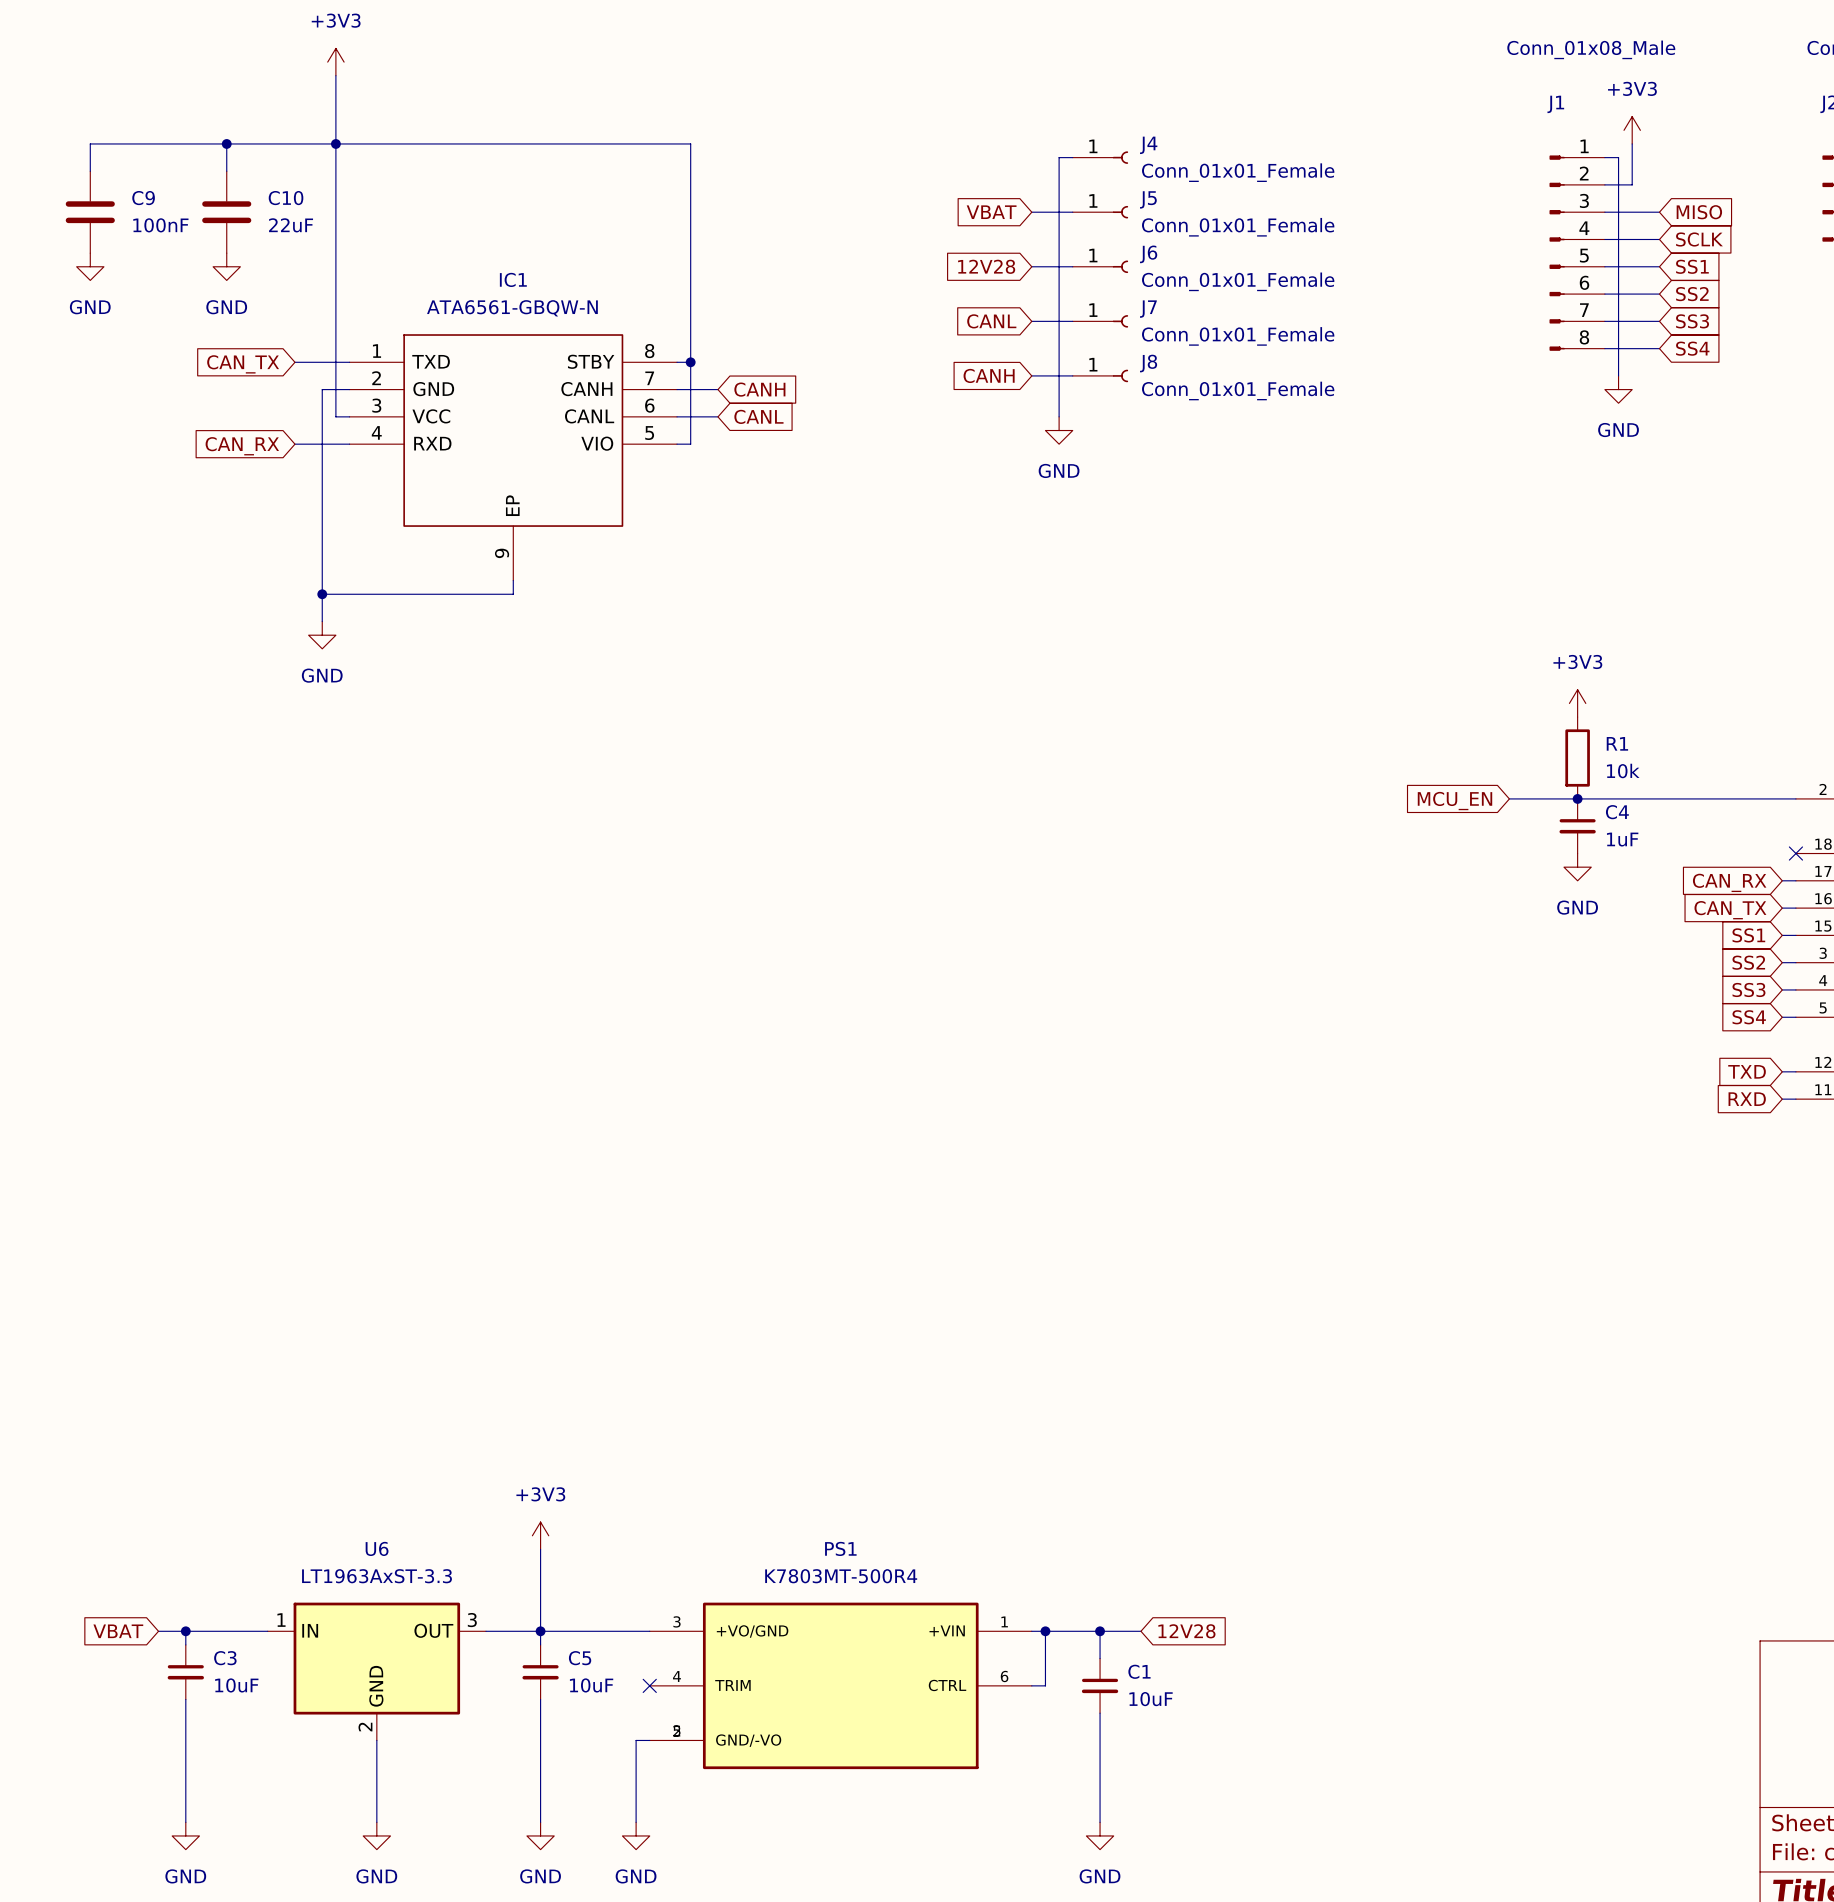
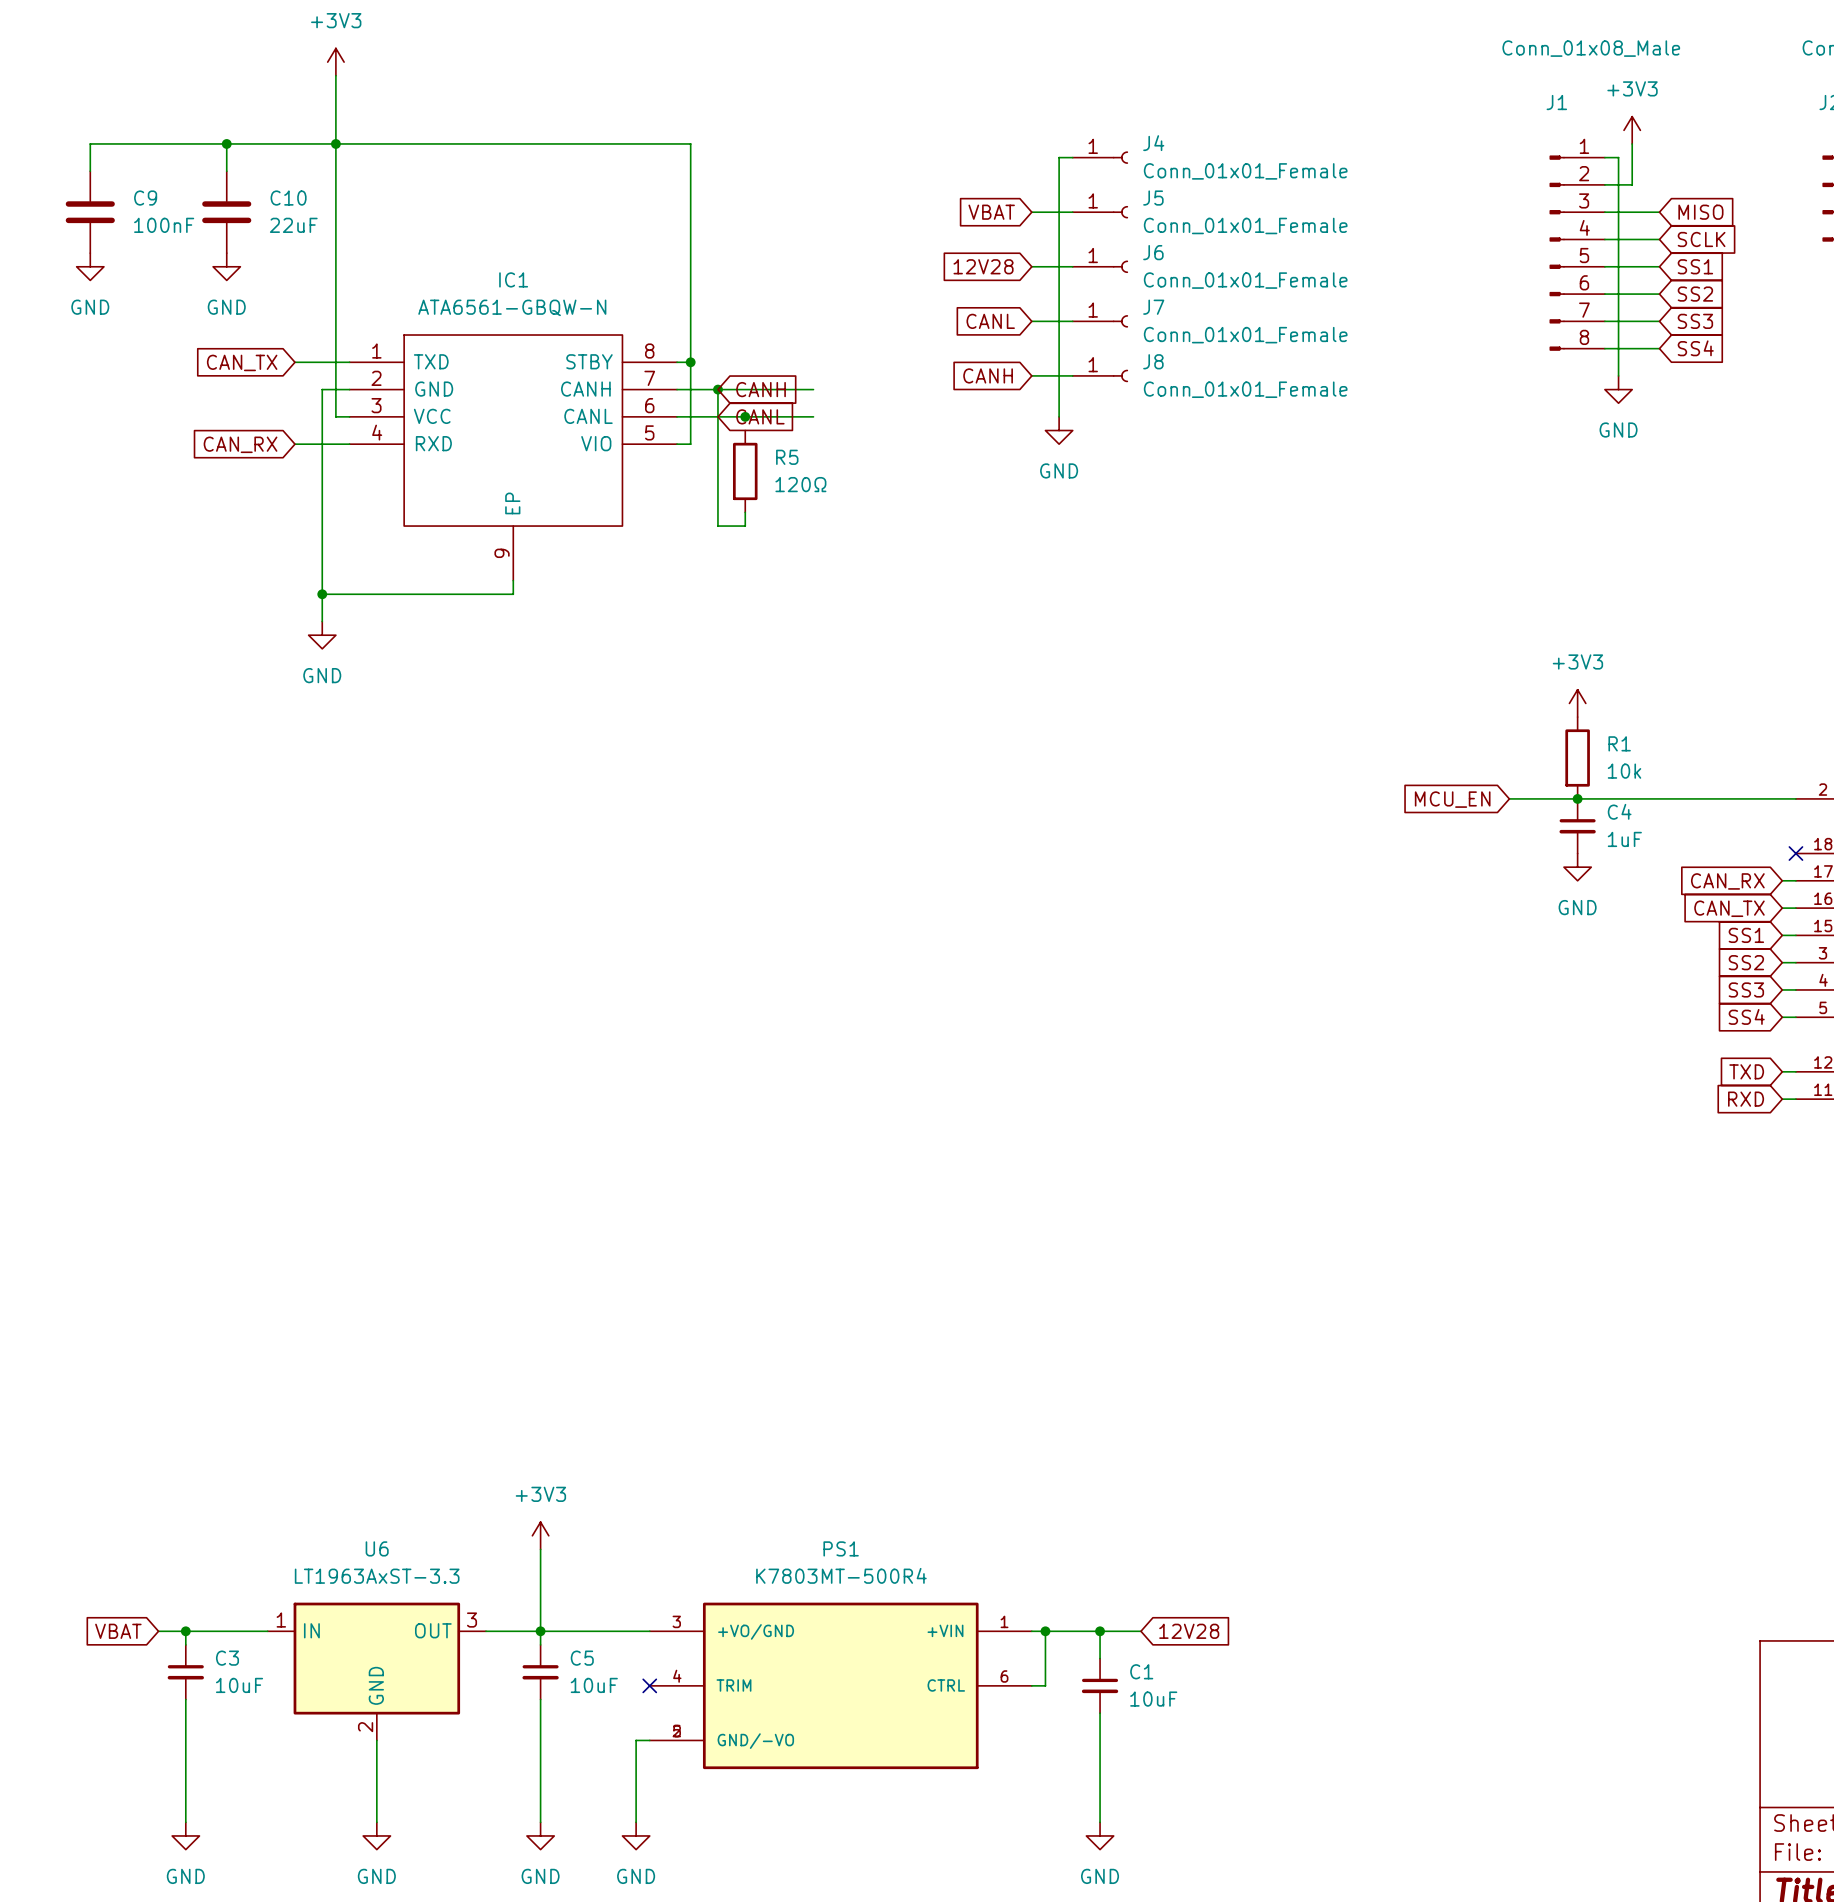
junction: none -> (717, 389)
wire: none -> (813, 389) (717, 389) (717, 526) (745, 526) (745, 512)
wire: none -> (717, 416) (813, 416)
junction: none -> (745, 416)
R5: none -> 120Ω (745, 471)

